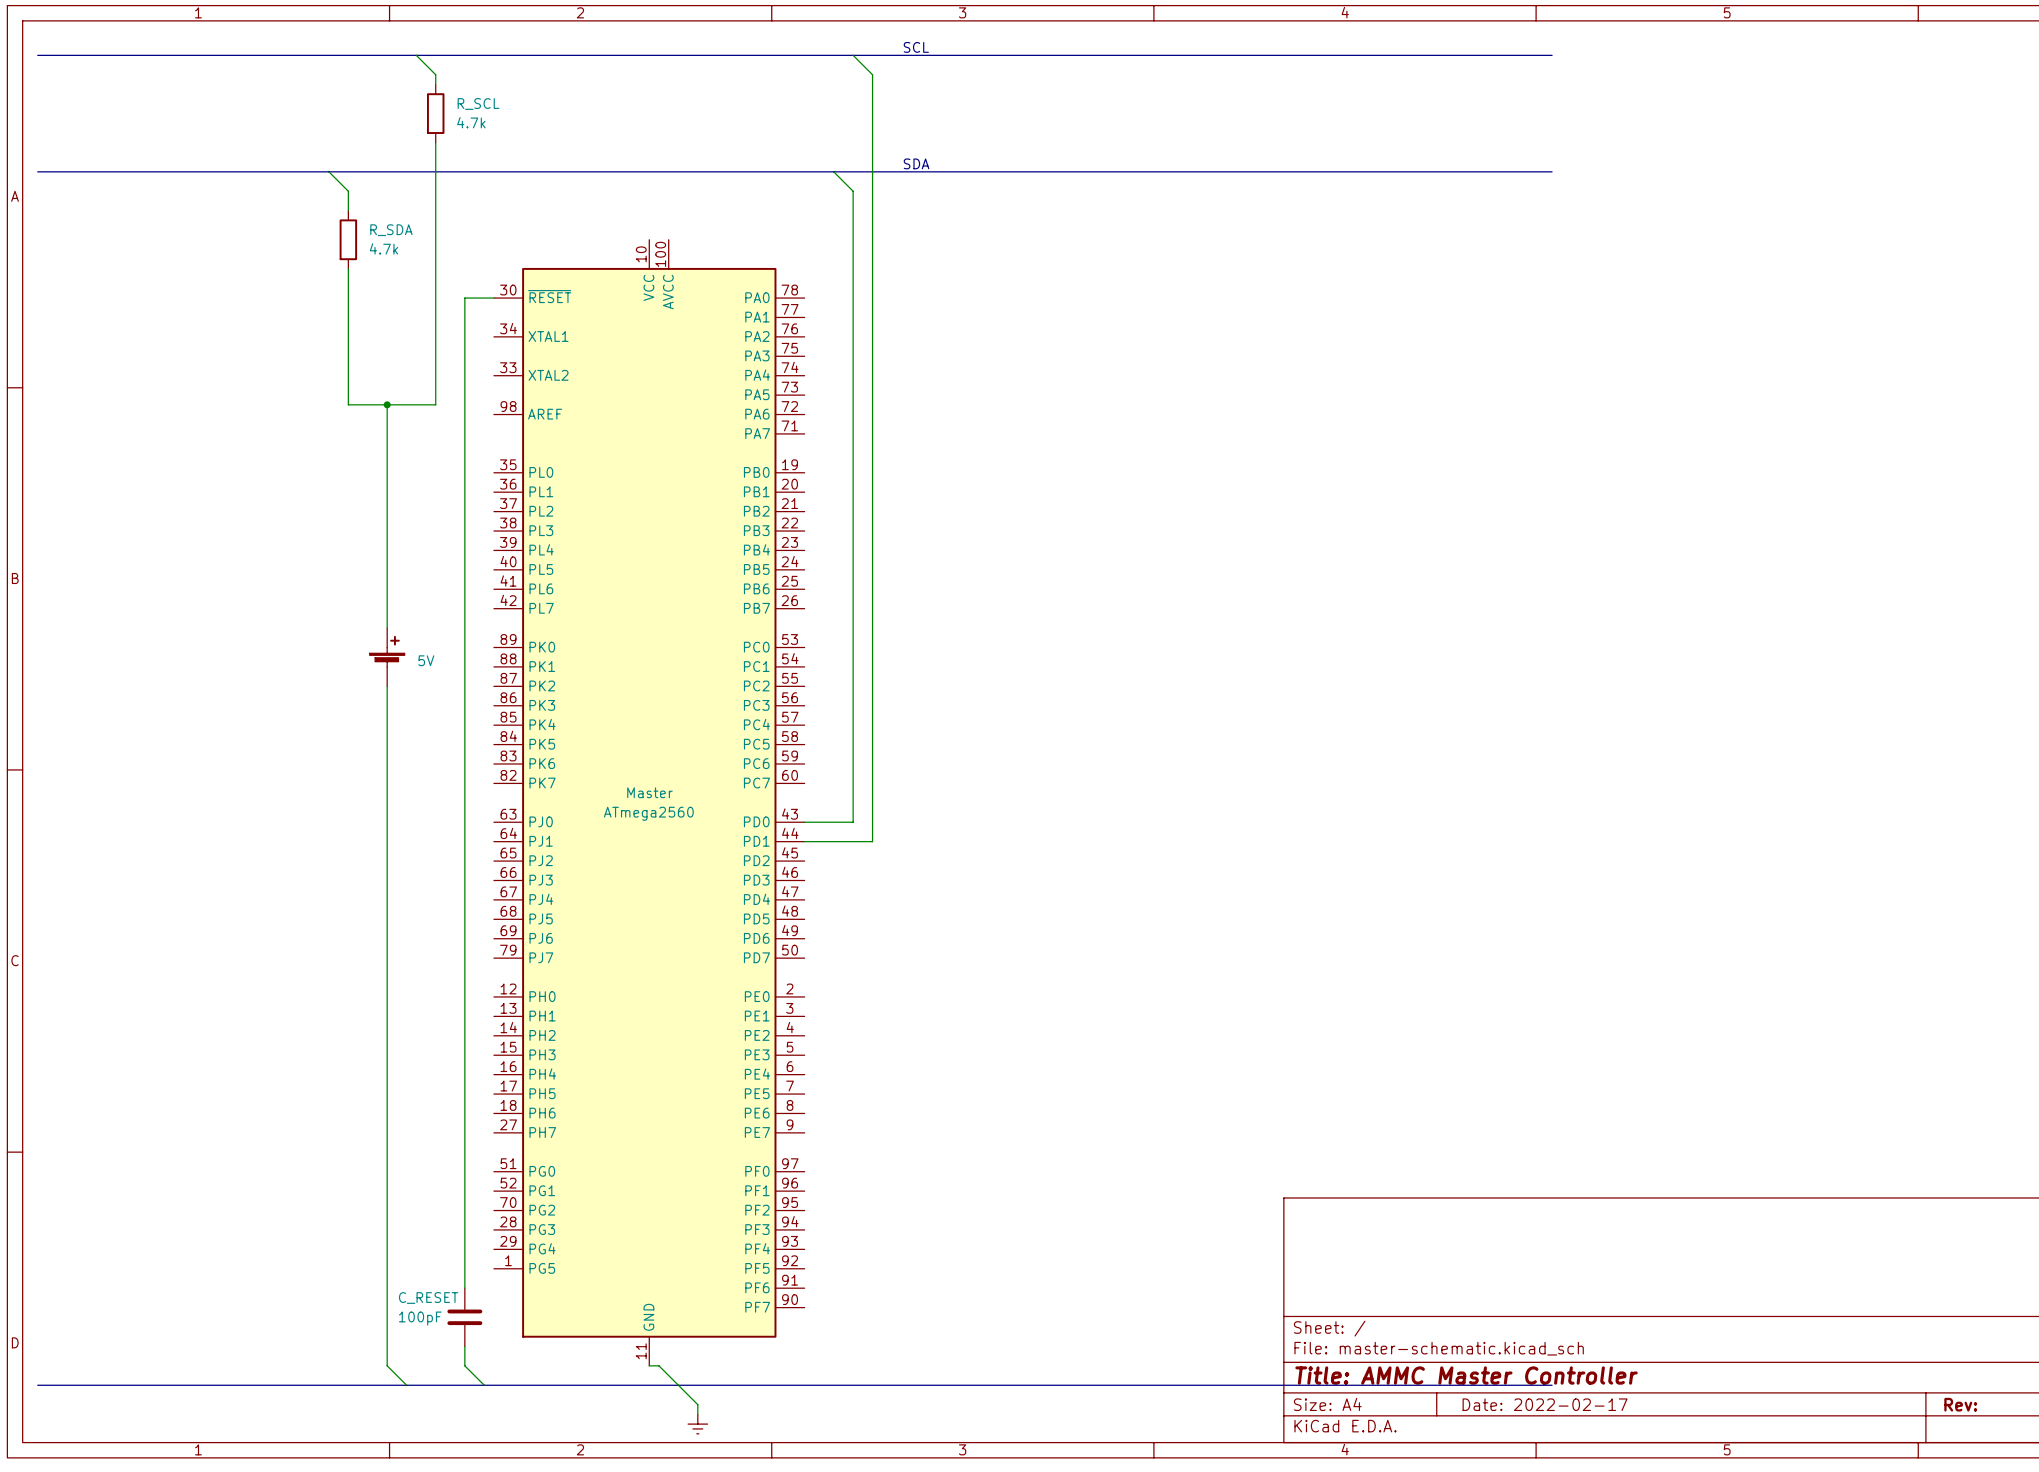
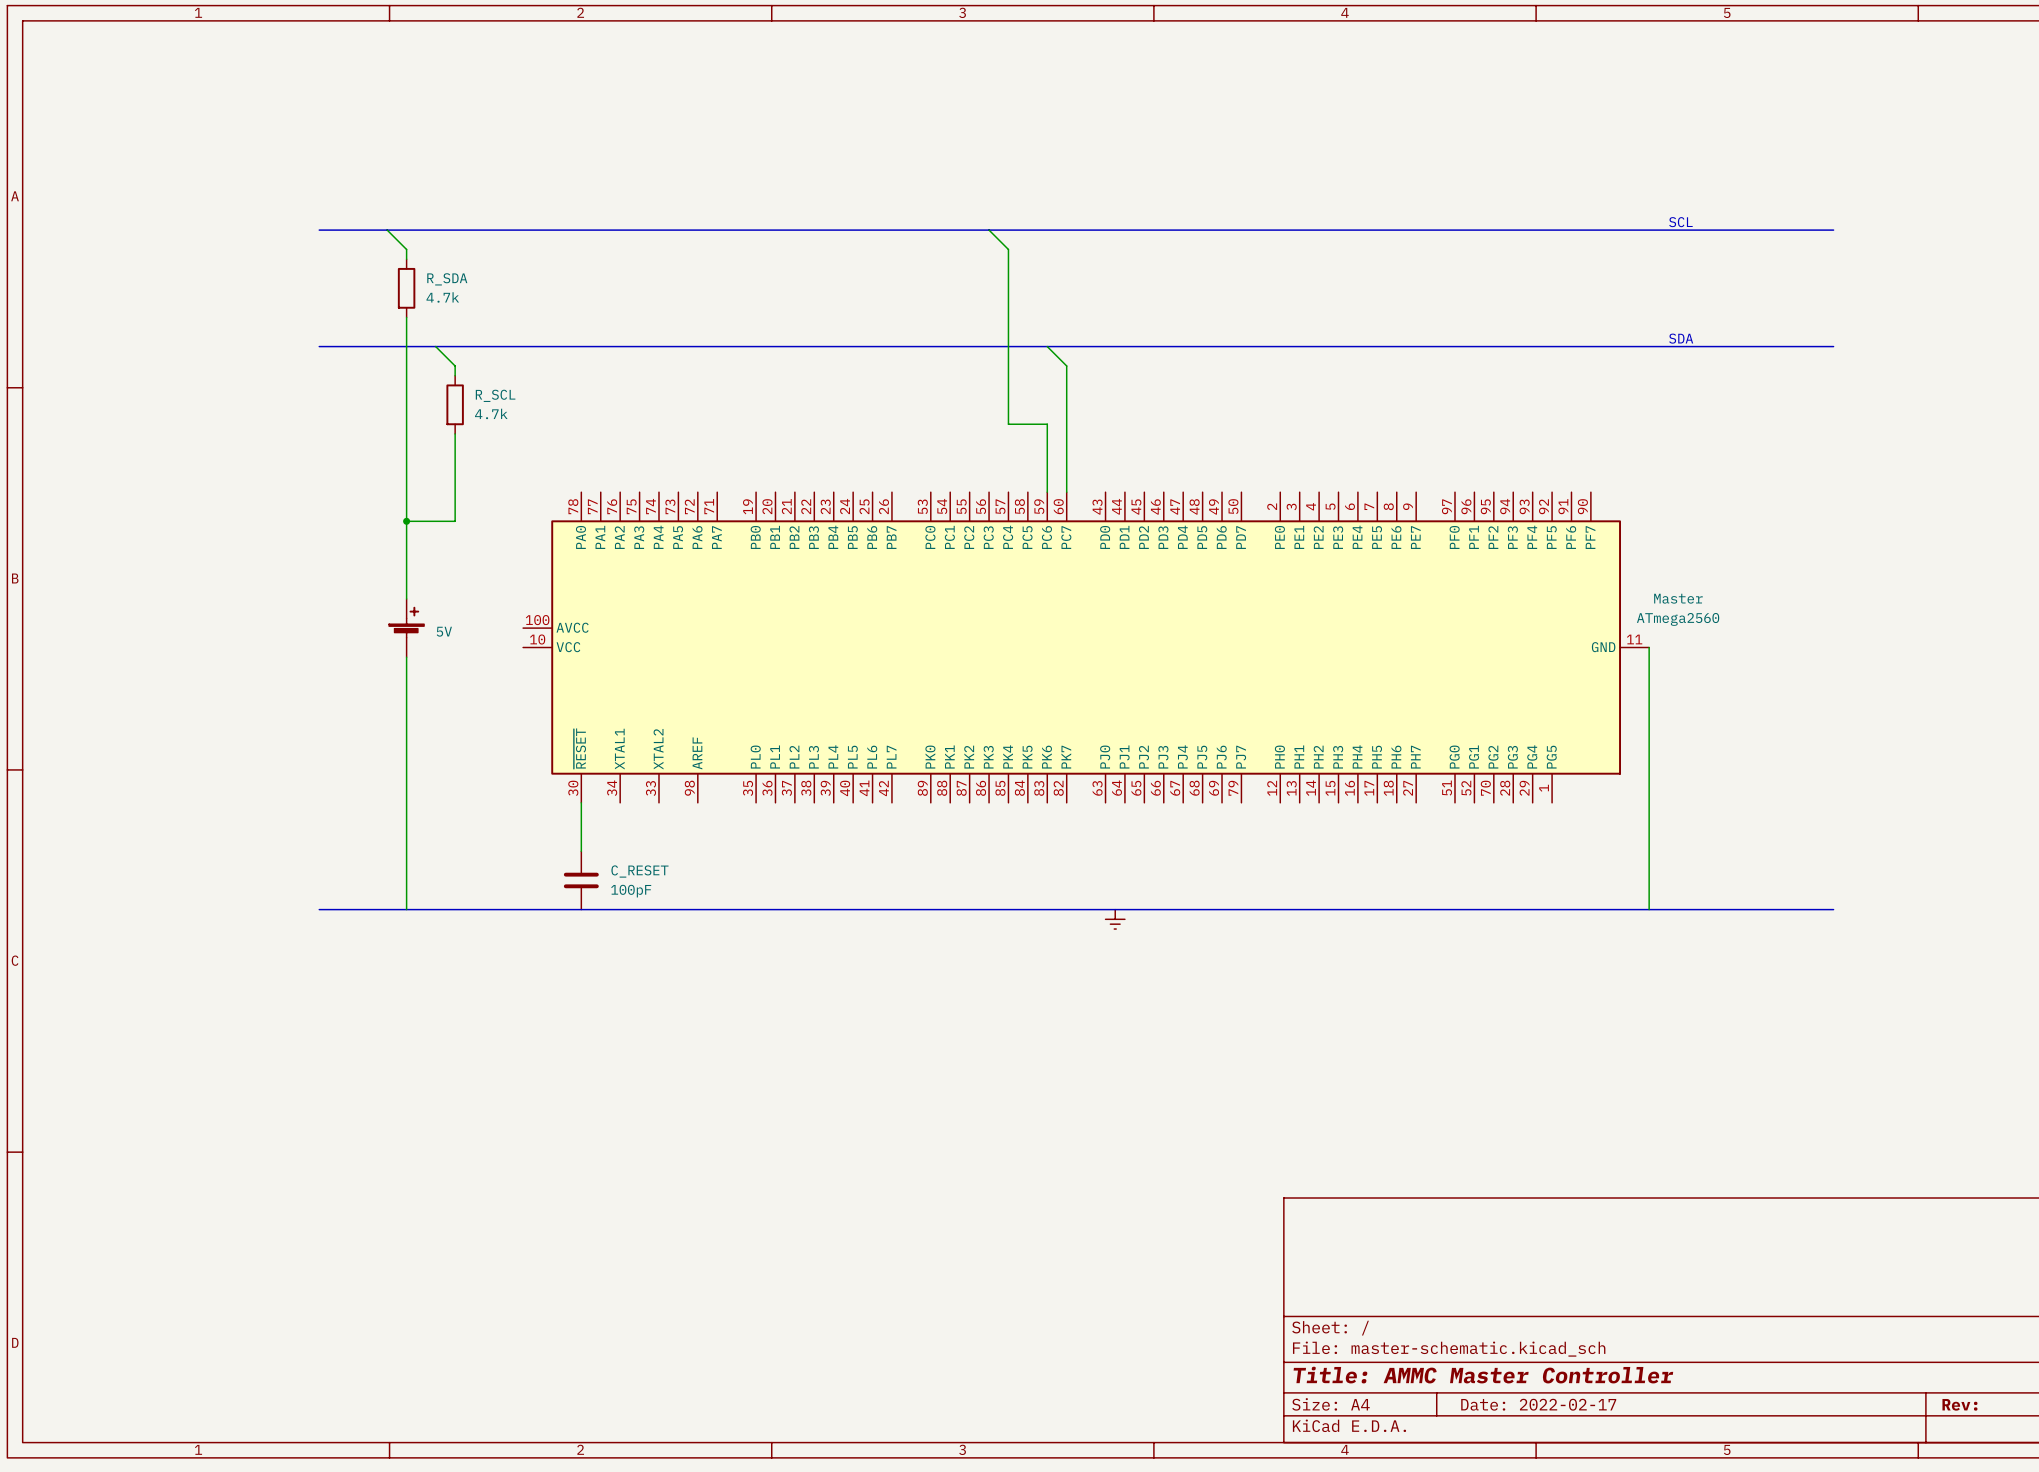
text: SCL (916, 47) -> none
bus: (37, 55) (1552, 55) -> none
wire: (416, 55) (435, 74) (435, 84) -> (387, 230) (406, 249) (406, 259)
wire: (853, 55) (872, 74) (872, 841) (804, 841) -> none
R_SCL: 4.7k (435, 113) -> none
wire: (435, 142) (435, 404) (348, 404) (348, 268) -> none
text: SDA (916, 163) -> none
bus: (37, 171) (1552, 171) -> none
wire: (328, 171) (348, 191) (348, 210) -> none
wire: (833, 171) (853, 191) (853, 822) (804, 822) -> none
text: none -> SCL (1680, 222)
bus: none -> (319, 230) (1833, 230)
wire: none -> (989, 230) (1008, 249) (1008, 424) (1047, 424) (1047, 492)
R_SDA position: (348, 239) -> (406, 288)
wire: (493, 298) (464, 298) (464, 1288) -> none
wire: none -> (406, 317) (406, 598)
text: none -> SDA (1681, 338)
bus: none -> (319, 346) (1833, 346)
wire: none -> (435, 346) (455, 365) (455, 375)
wire: none -> (1047, 346) (1066, 365) (1066, 492)
wire: (387, 404) (387, 628) -> none
junction: (387, 404) -> none
R_SCL: none -> 4.7k (455, 404)
wire: none -> (455, 433) (455, 521) (406, 521)
junction: none -> (406, 521)
Master: none -> ATmega2560 (1086, 647)
wire: none -> (1649, 647) (1649, 909)
part position: (387, 657) -> (406, 628)
wire: none -> (406, 657) (406, 909)
wire: (387, 686) (387, 1365) (406, 1385) -> none
Master: ATmega2560 (649, 802) -> none
C_RESET: none -> 100pF (581, 880)
bus: none -> (319, 909) (1833, 909)
power symbol: none -> (1115, 919)
C_RESET: 100pF (464, 1317) -> none
wire: (464, 1346) (464, 1365) (484, 1385) -> none
wire: (649, 1365) (658, 1365) (697, 1404) (697, 1414) -> none
bus: (37, 1385) (1552, 1385) -> none
power symbol: (697, 1424) -> none

